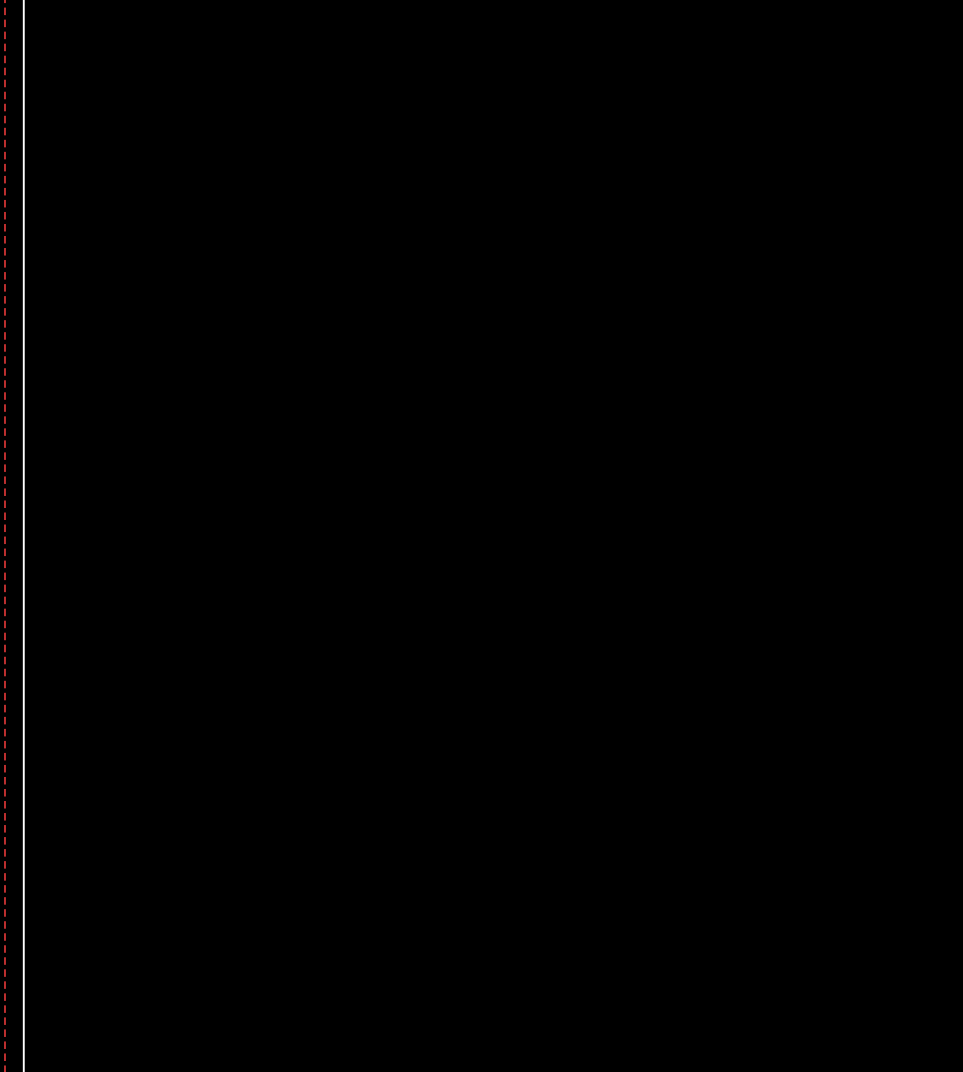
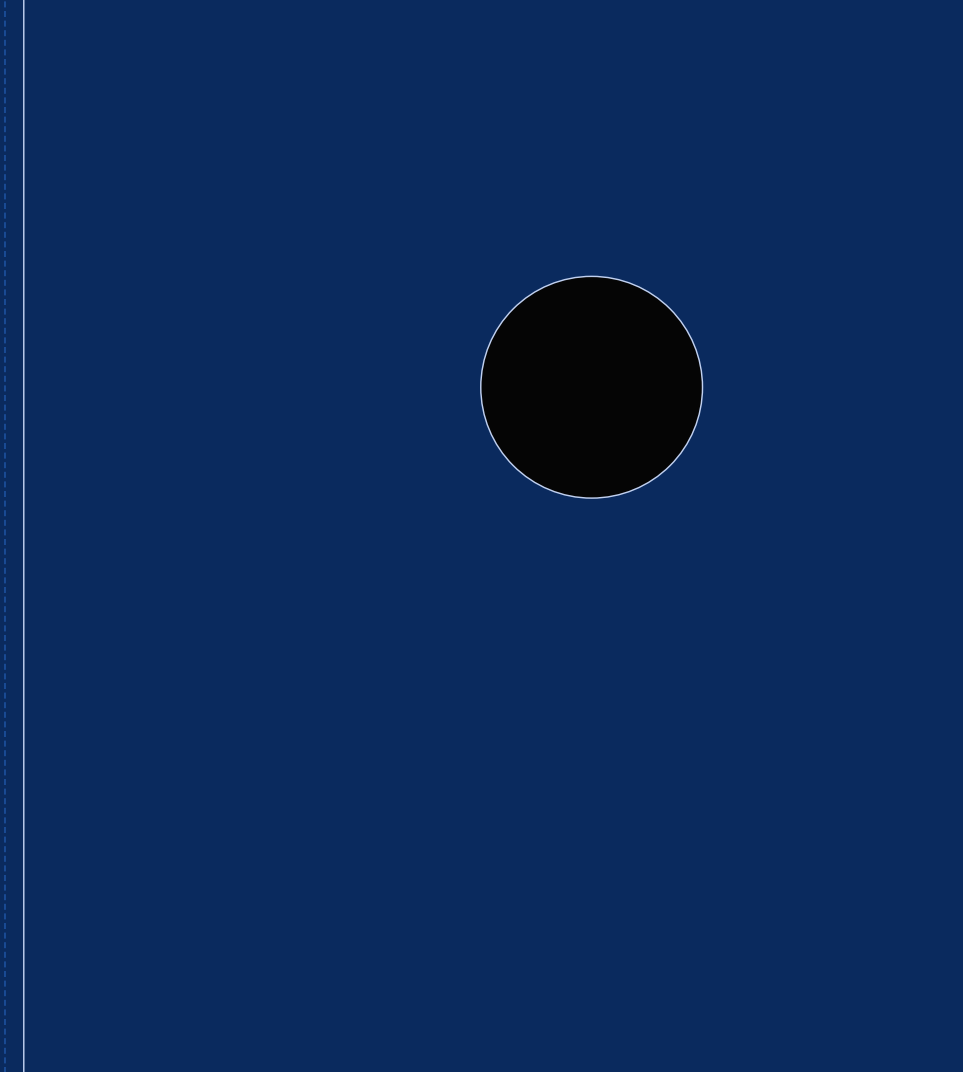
hole: none -> (591, 387)

